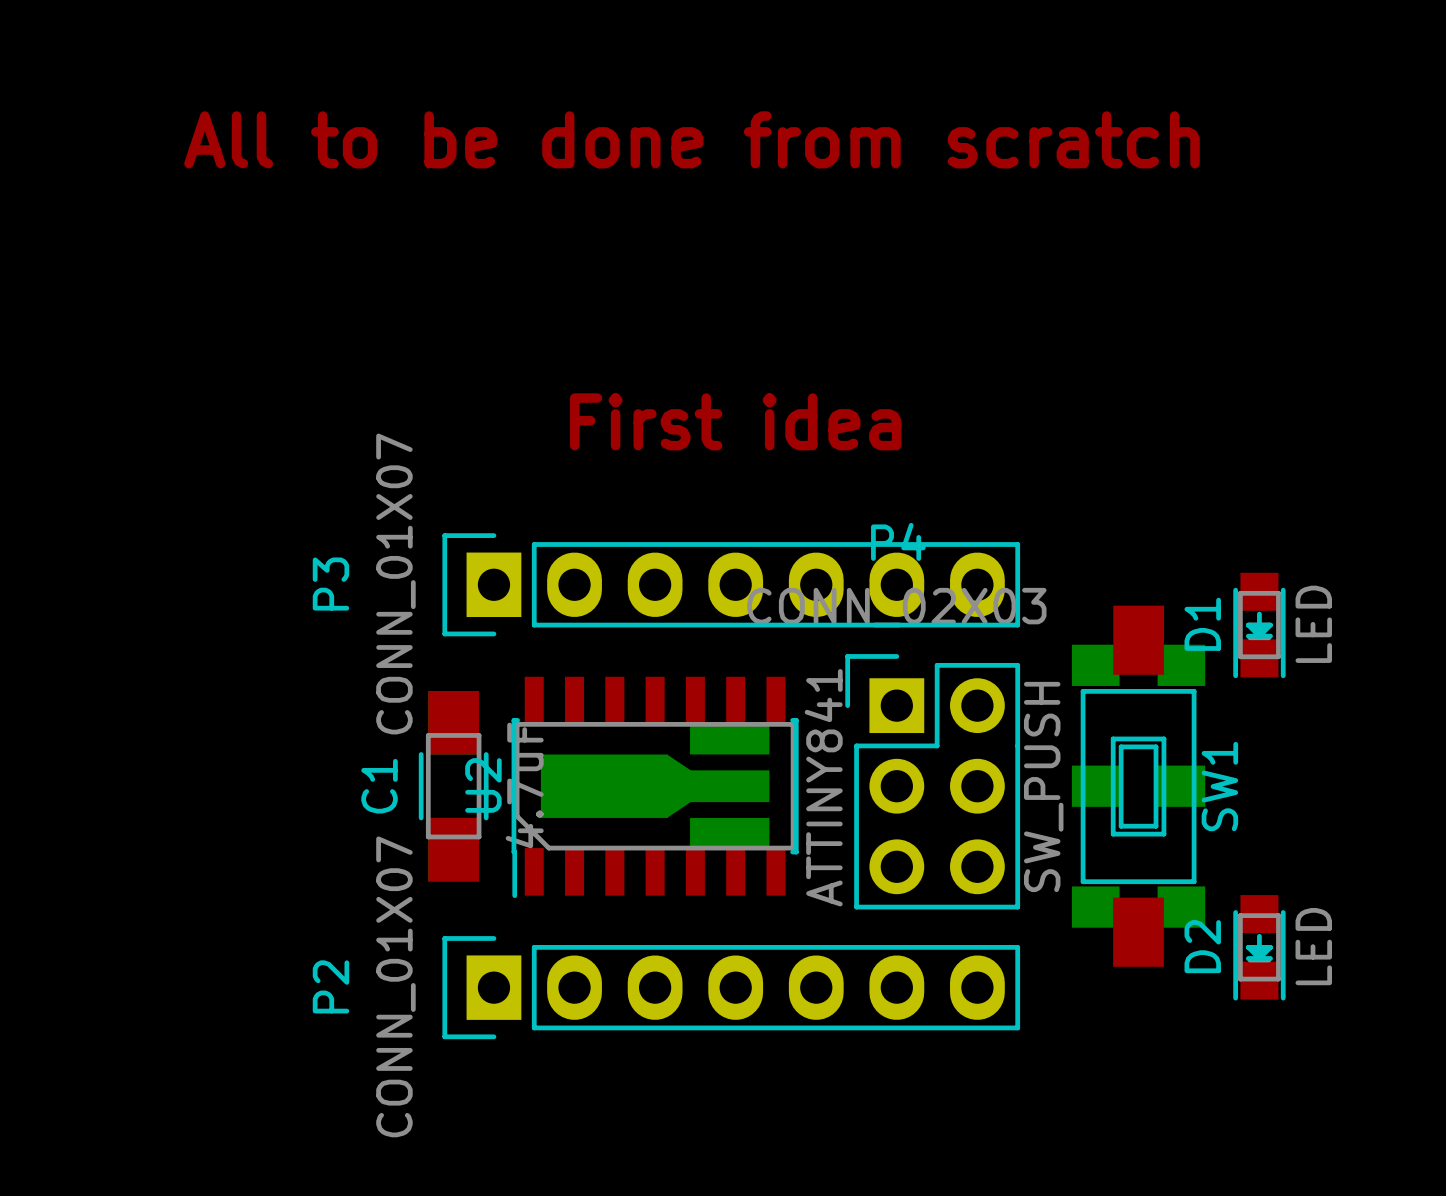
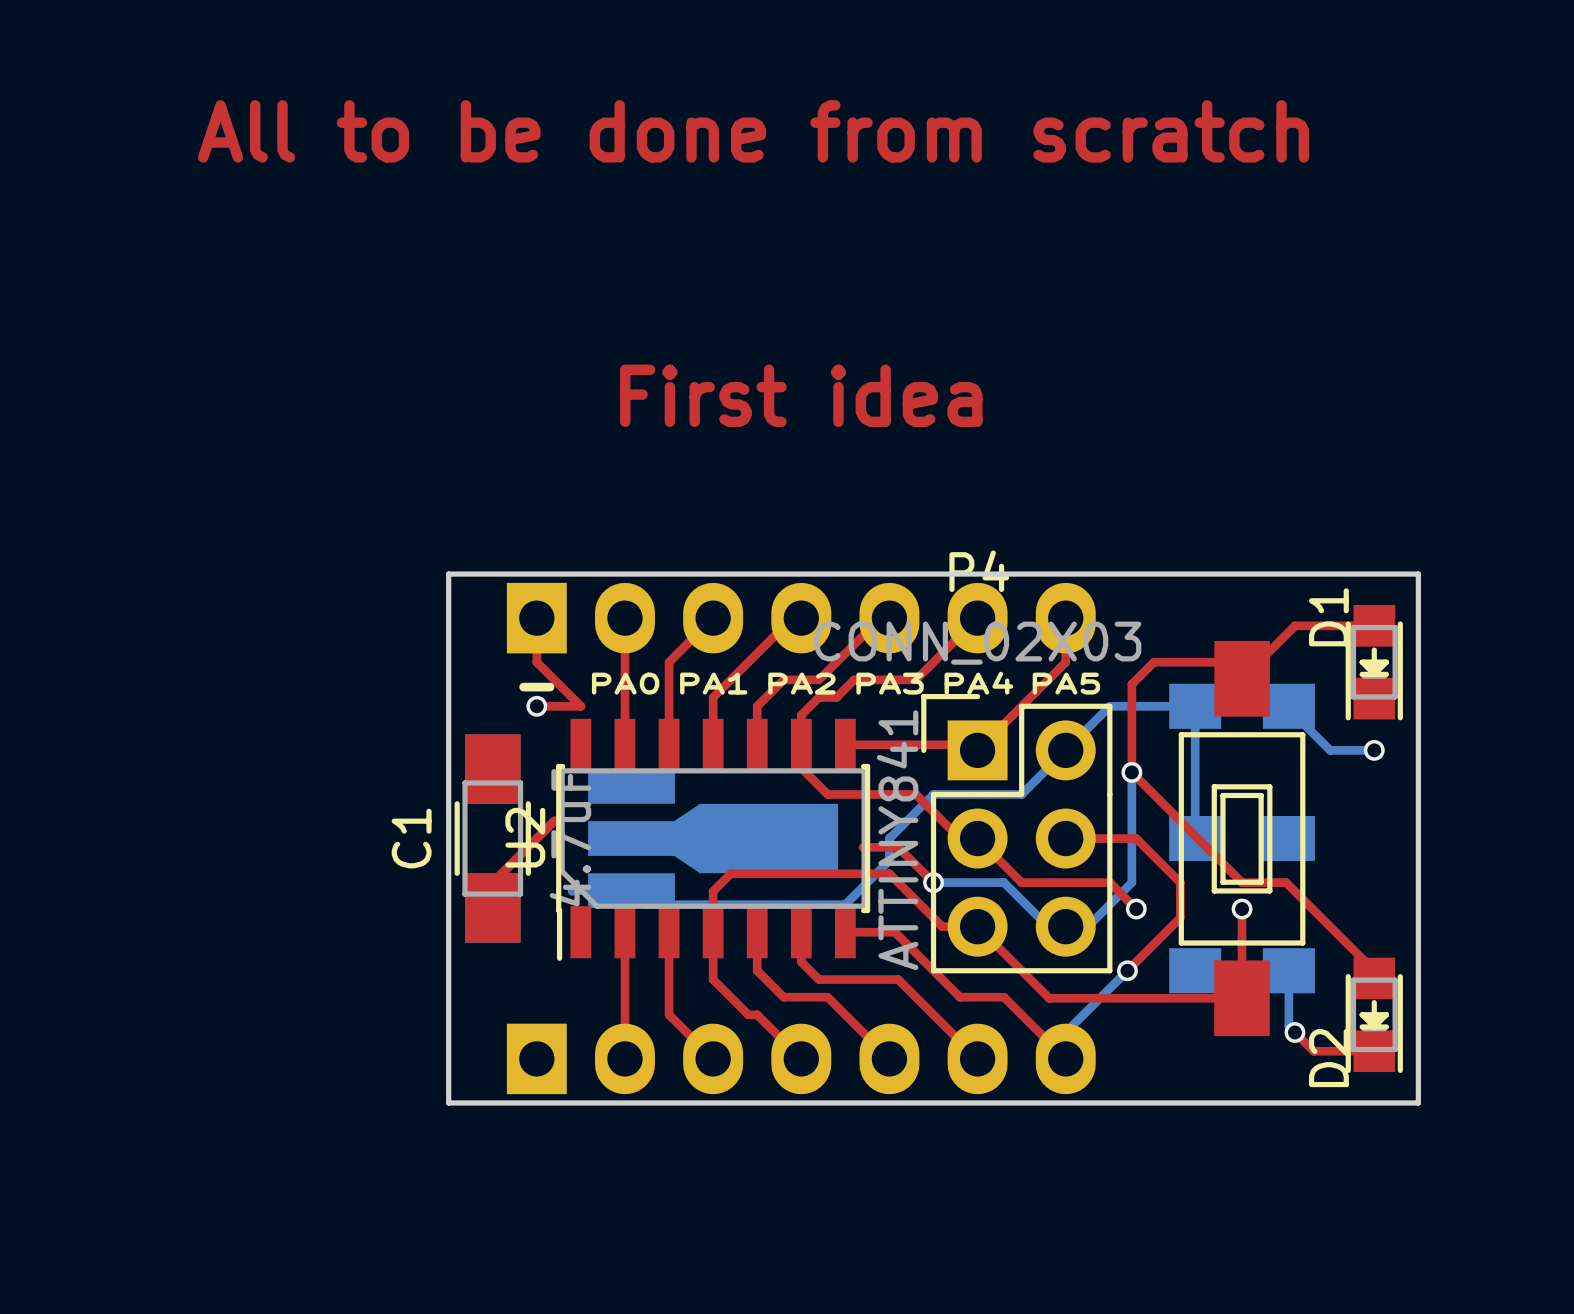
text position: First idea (735, 421) -> First idea (801, 395)
board edge: none -> (448, 574) (448, 1102) (1418, 1102) (1418, 574) (448, 574)
top track: none -> (536, 618) (536, 662) (580, 706) (536, 706)
top track: none -> (624, 618) (624, 744)
top track: none -> (713, 618) (669, 662) (669, 744)
P3 side: top (731, 584) -> bottom (801, 618)
top track: none -> (801, 618) (792, 618) (713, 697) (713, 744)
top track: none -> (889, 618) (880, 618) (818, 679) (783, 679) (757, 706) (757, 744)
top track: none -> (977, 618) (915, 679) (854, 679) (836, 697) (818, 697) (801, 715) (801, 768) (827, 794) (915, 794) (959, 838) (977, 838) (1021, 882) (1109, 882) (1136, 909)
top track: none -> (1065, 618) (1065, 662) (977, 750) (972, 744) (845, 744)
top track: none -> (1374, 625) (1295, 625) (1242, 678) (1225, 662) (1153, 662) (1131, 684) (1131, 772) (1242, 882) (1286, 882) (1374, 970) (1374, 978)
D1 name position: D1 (1202, 624) -> D1 (1328, 617)
D1 value: LED (1313, 624) -> none
text: none -> PA0 (625, 683)
text: none -> PA1 (713, 683)
text: none -> PA2 (801, 683)
text: none -> PA3 (890, 683)
text: none -> PA4 (978, 683)
text: none -> PA5 (1066, 683)
text: none -> - (536, 687)
via: none -> (536, 706)
bottom track: none -> (1288, 706) (1288, 709) (1330, 750) (1374, 750)
via: none -> (1374, 750)
bottom track: none -> (1131, 772) (1131, 882) (1087, 926) (1048, 926) (1004, 882) (933, 882)
via: none -> (1131, 772)
top track: none -> (554, 820) (492, 882) (492, 907)
part rotation: 0° (655, 786) -> 180° (713, 838)
top track: none -> (1065, 838) (1136, 838) (1180, 882) (1180, 917) (1127, 970)
SW1 value: SW_PUSH (1043, 786) -> none
bottom track: none -> (1195, 838) (1195, 706) (1109, 706) (1021, 794) (933, 794) (889, 838) (889, 860) (845, 904) (645, 904) (631, 890) (572, 891)
SW1 name: SW1 (1219, 786) -> none
top track: none -> (863, 847) (898, 847) (933, 882)
via: none -> (933, 882)
via: none -> (1136, 909)
top track: none -> (1241, 909) (1241, 998) (1049, 998) (977, 926) (942, 926) (889, 873) (730, 873) (713, 891) (713, 979) (748, 1014) (757, 1014) (801, 1058)
via: none -> (1242, 909)
top track: none -> (624, 932) (624, 1058)
top track: none -> (669, 932) (669, 1014) (713, 1058)
top track: none -> (757, 932) (757, 970) (783, 997) (827, 997) (889, 1058)
top track: none -> (801, 932) (801, 961) (818, 979) (898, 979) (977, 1058)
top track: none -> (845, 932) (895, 932) (959, 997) (1004, 997) (1065, 1058)
bottom track: none -> (1127, 970) (1065, 1032) (1065, 1058)
via: none -> (1127, 970)
bottom track: none -> (1288, 970) (1288, 1026) (1294, 1032)
D2 name position: D2 (1202, 946) -> D2 (1328, 1058)
D2 value: LED (1313, 946) -> none
top track: none -> (1294, 1032) (1313, 1051) (1374, 1051)
via: none -> (1294, 1032)
P2 side: top (731, 987) -> bottom (801, 1058)

